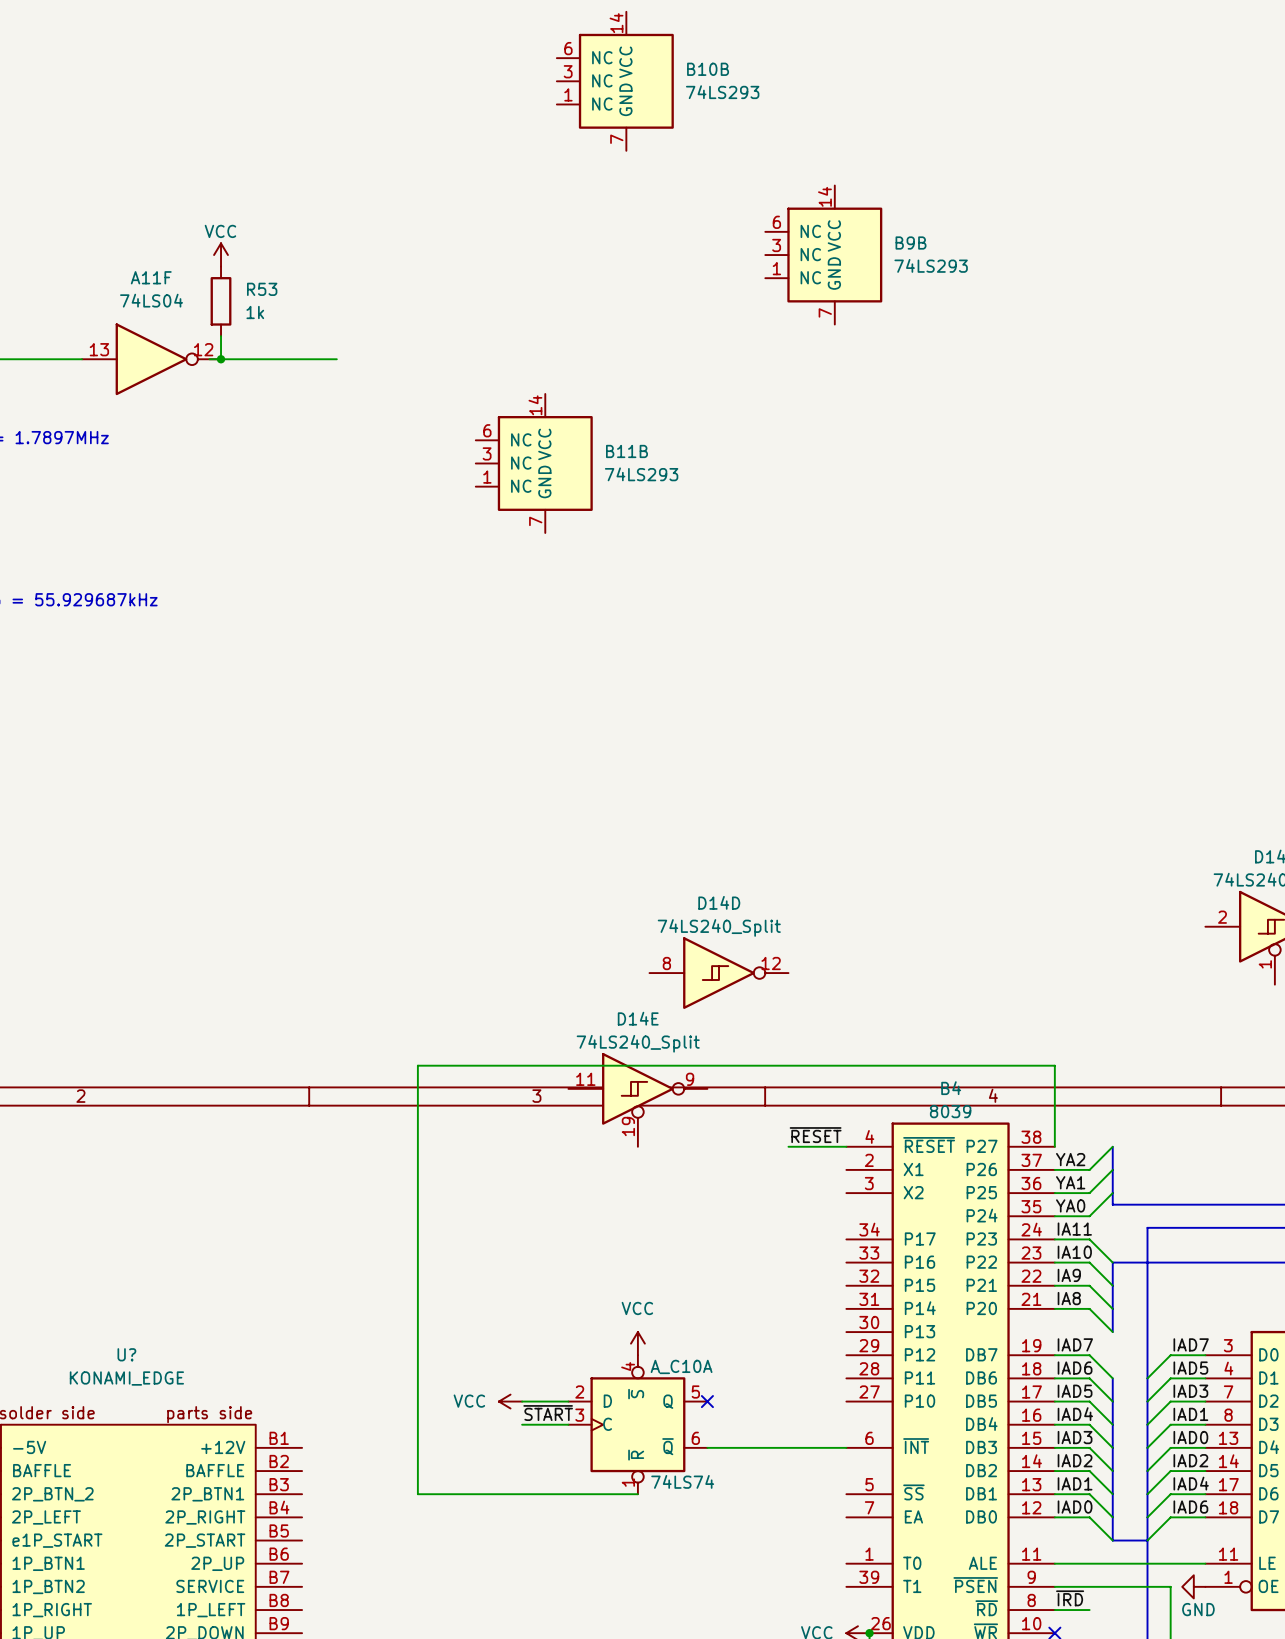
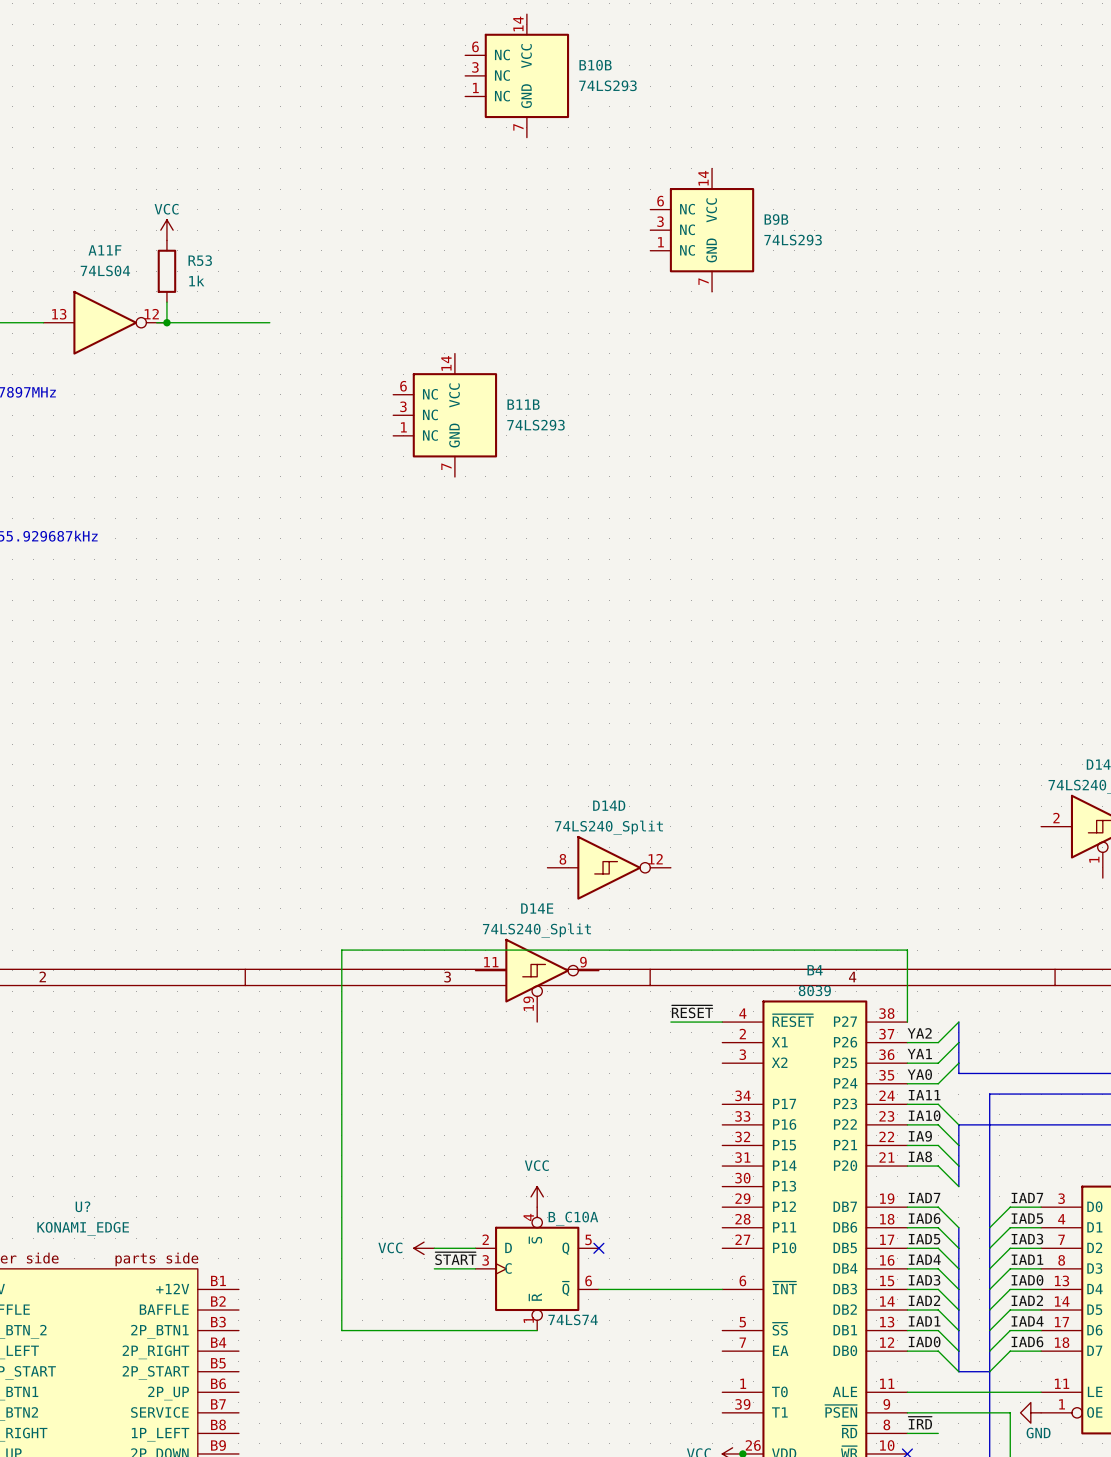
A_C10A name: A_C10A (681, 1366) -> B_C10A (573, 1218)

